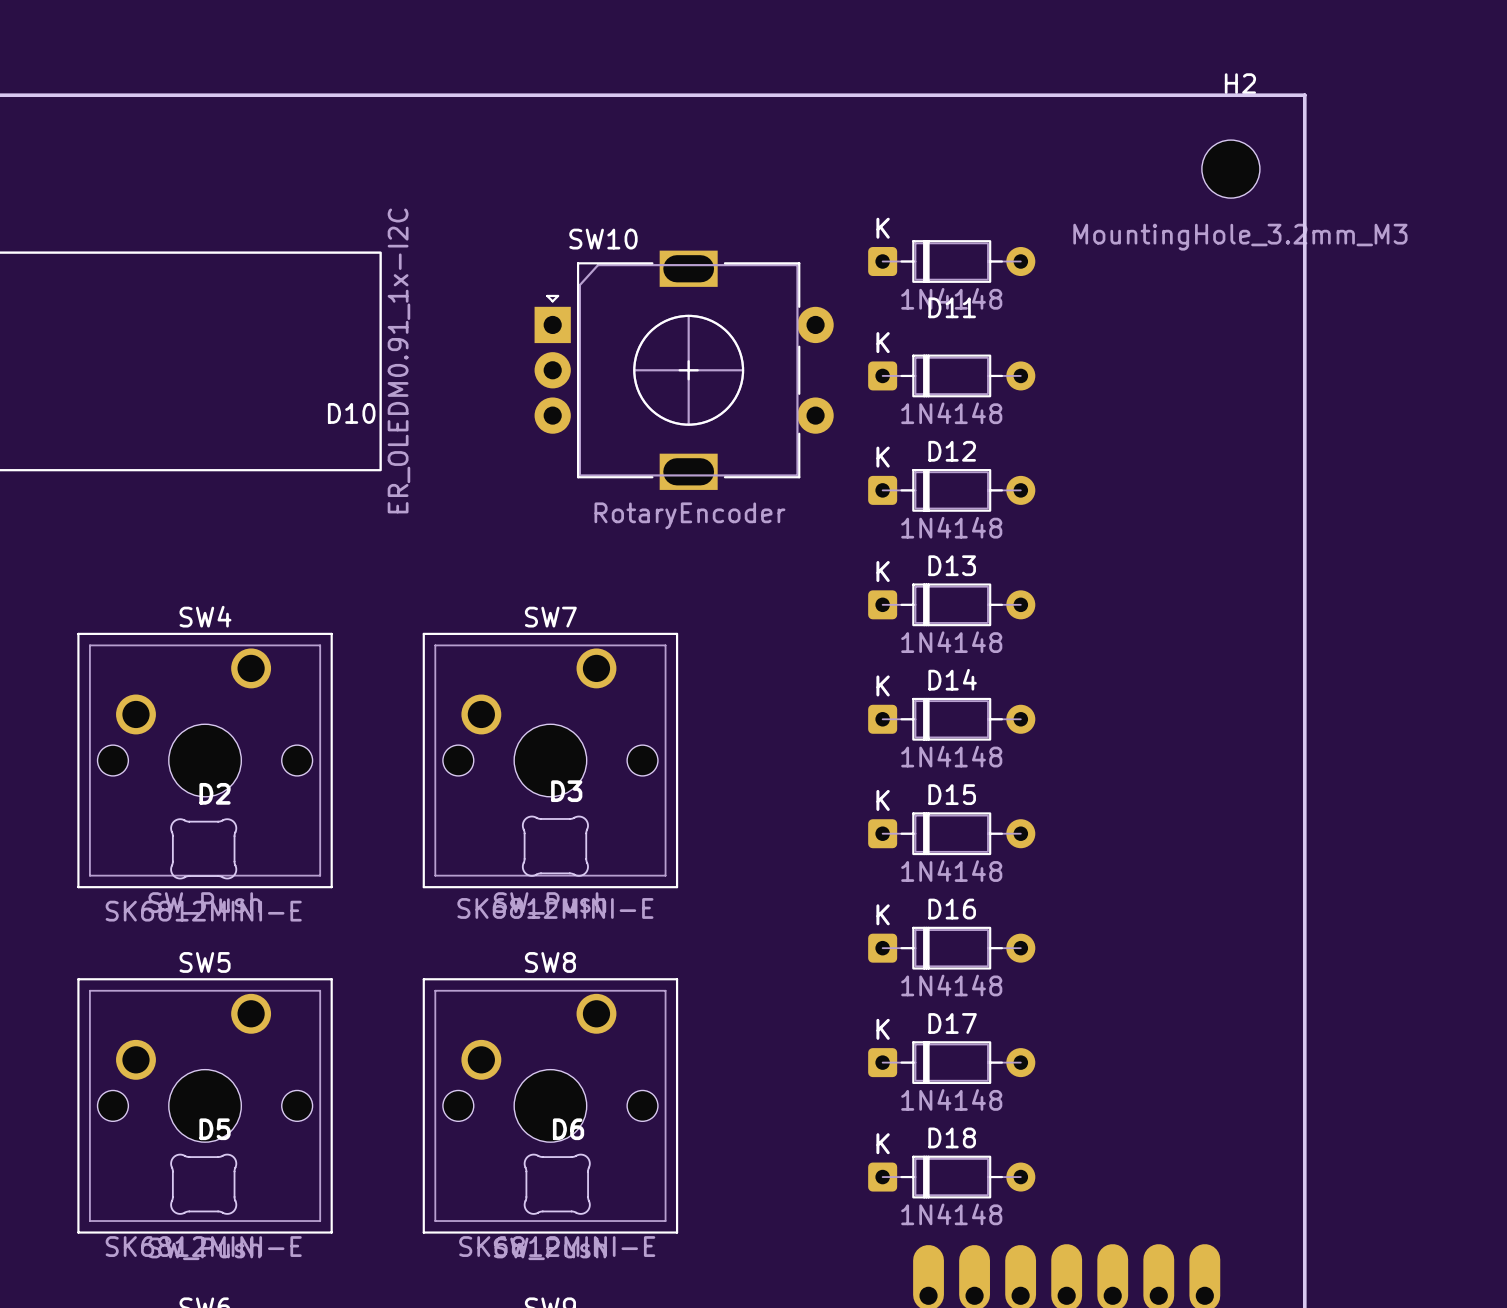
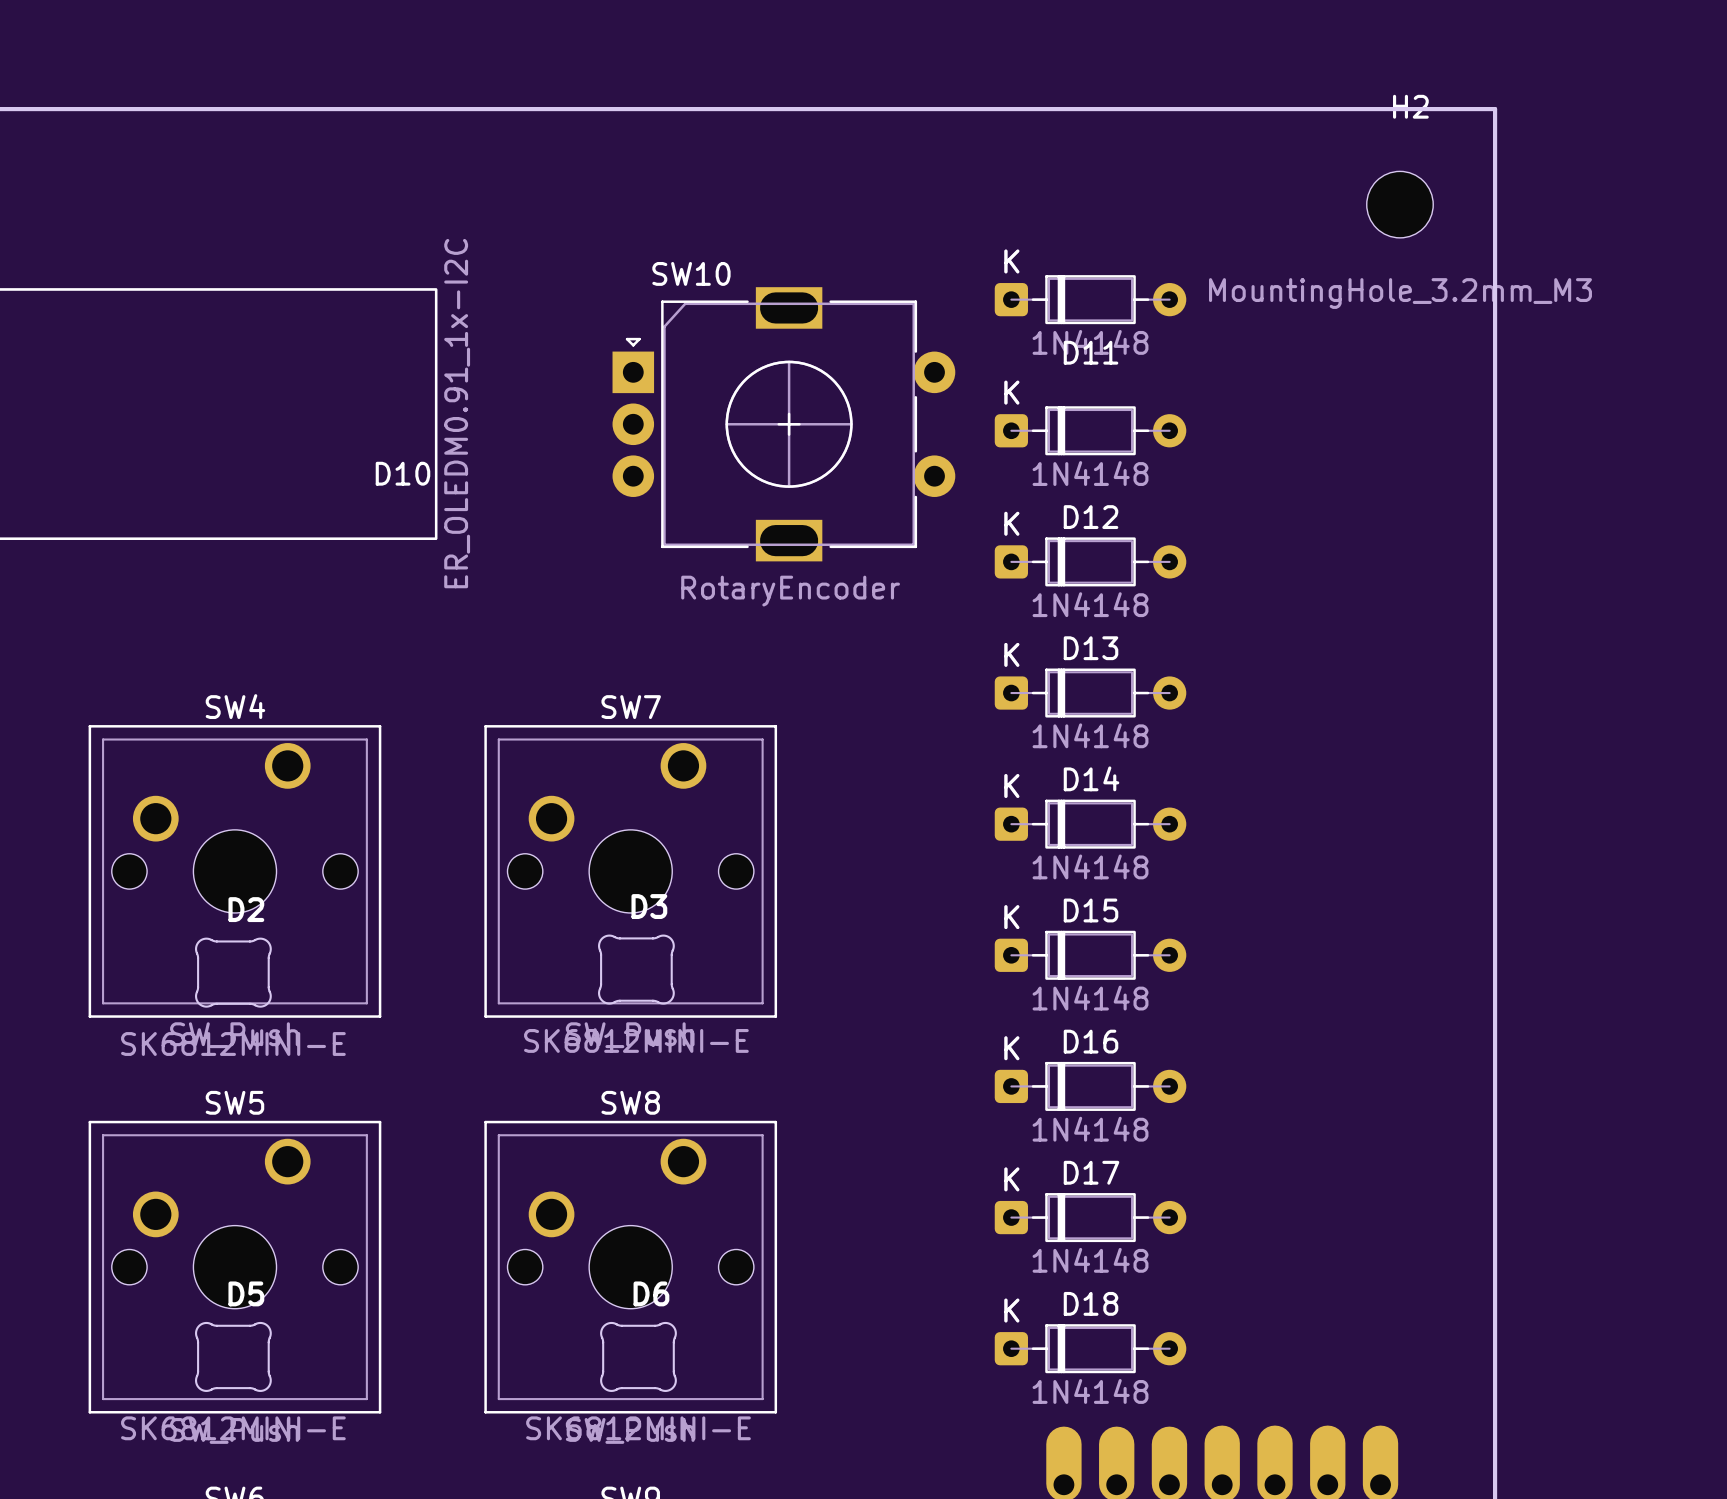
H2 position: (1230, 169) -> (1399, 204)
H2 value position: MountingHole_3.2mm_M3 (1240, 237) -> MountingHole_3.2mm_M3 (1400, 293)

